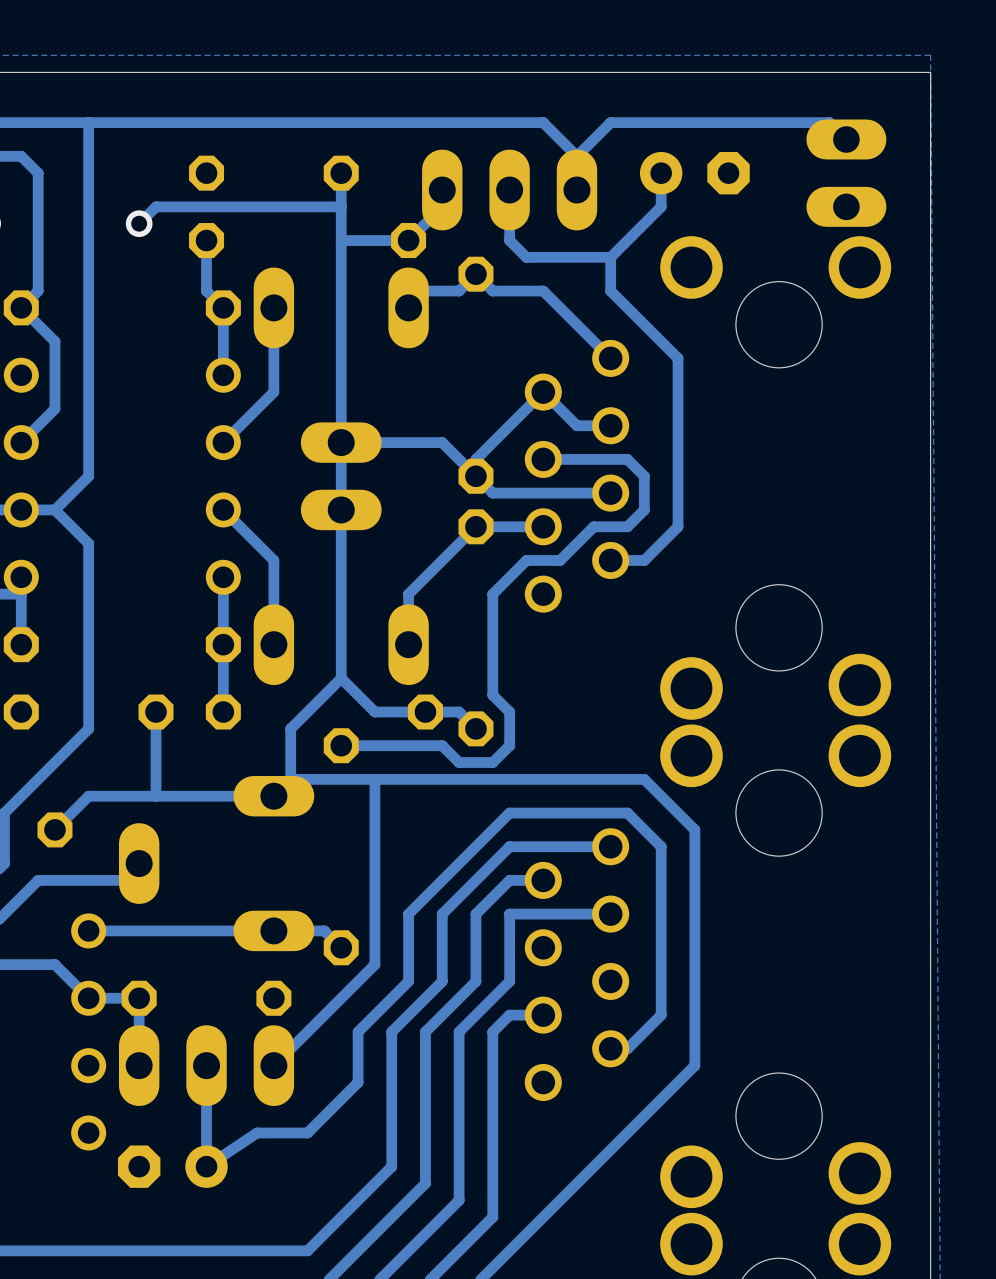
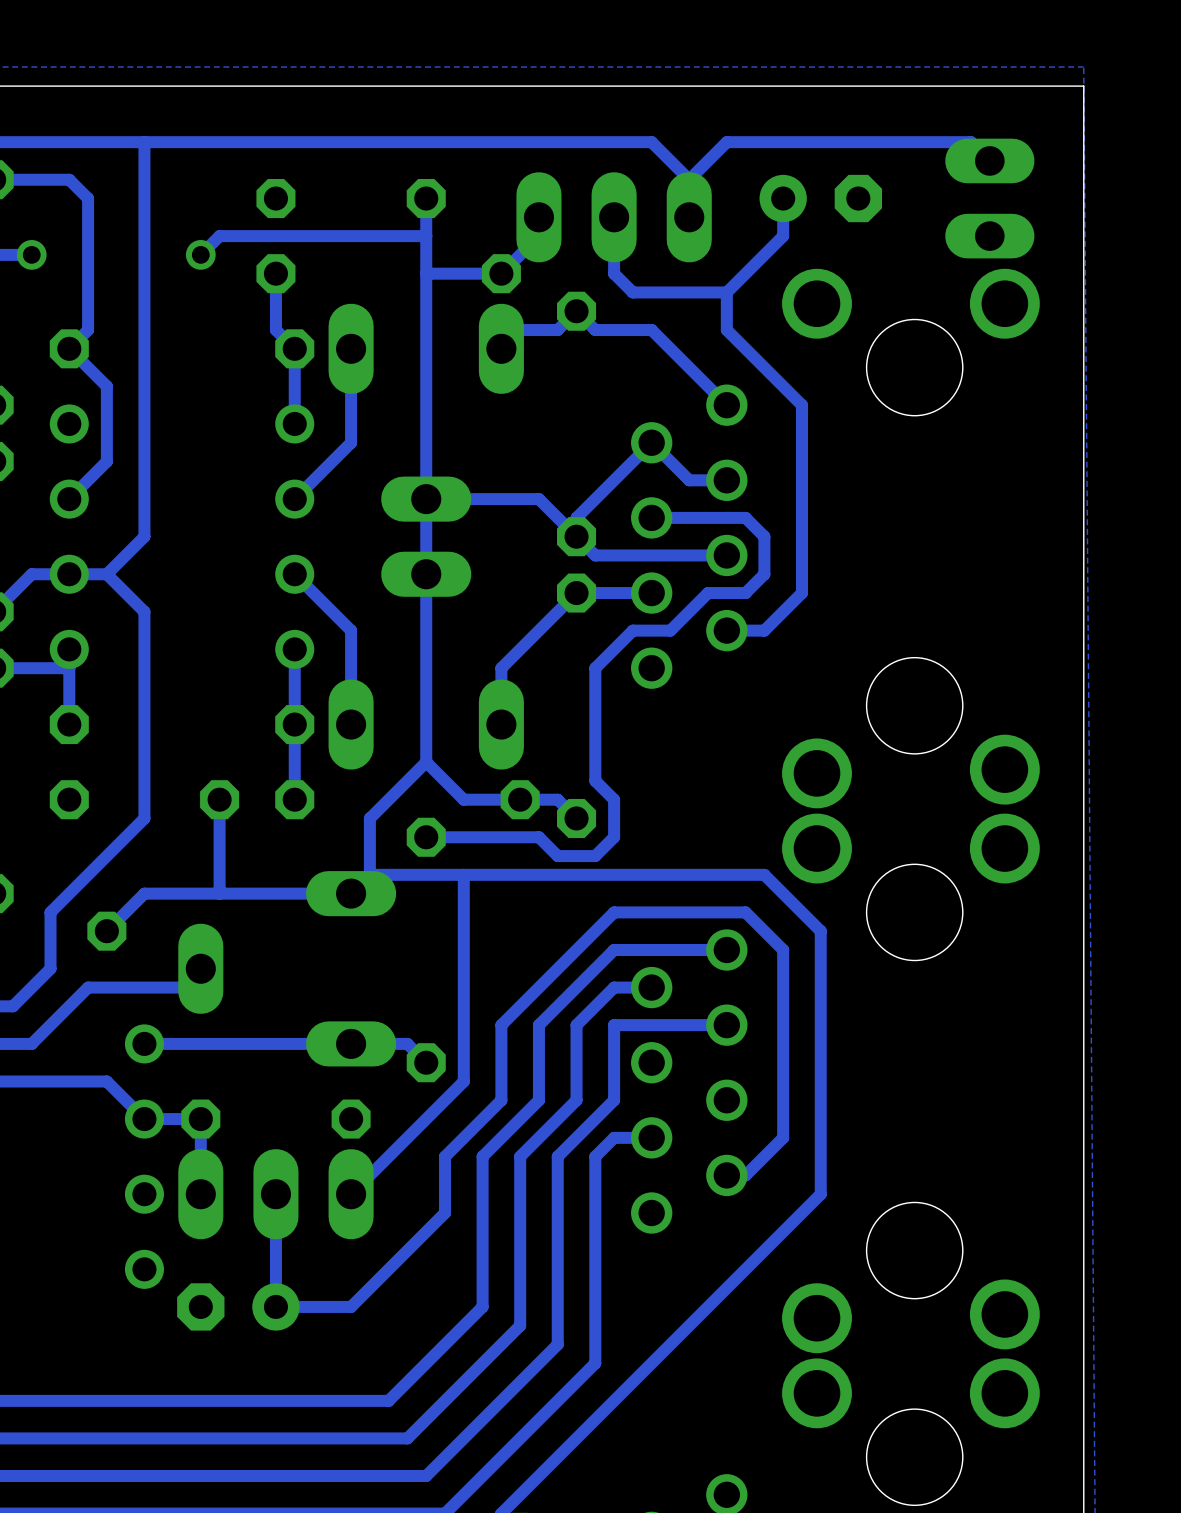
track: (307, 1132) (257, 1132) (206, 1166) -> (388, 1269) (351, 1306) (275, 1306)

